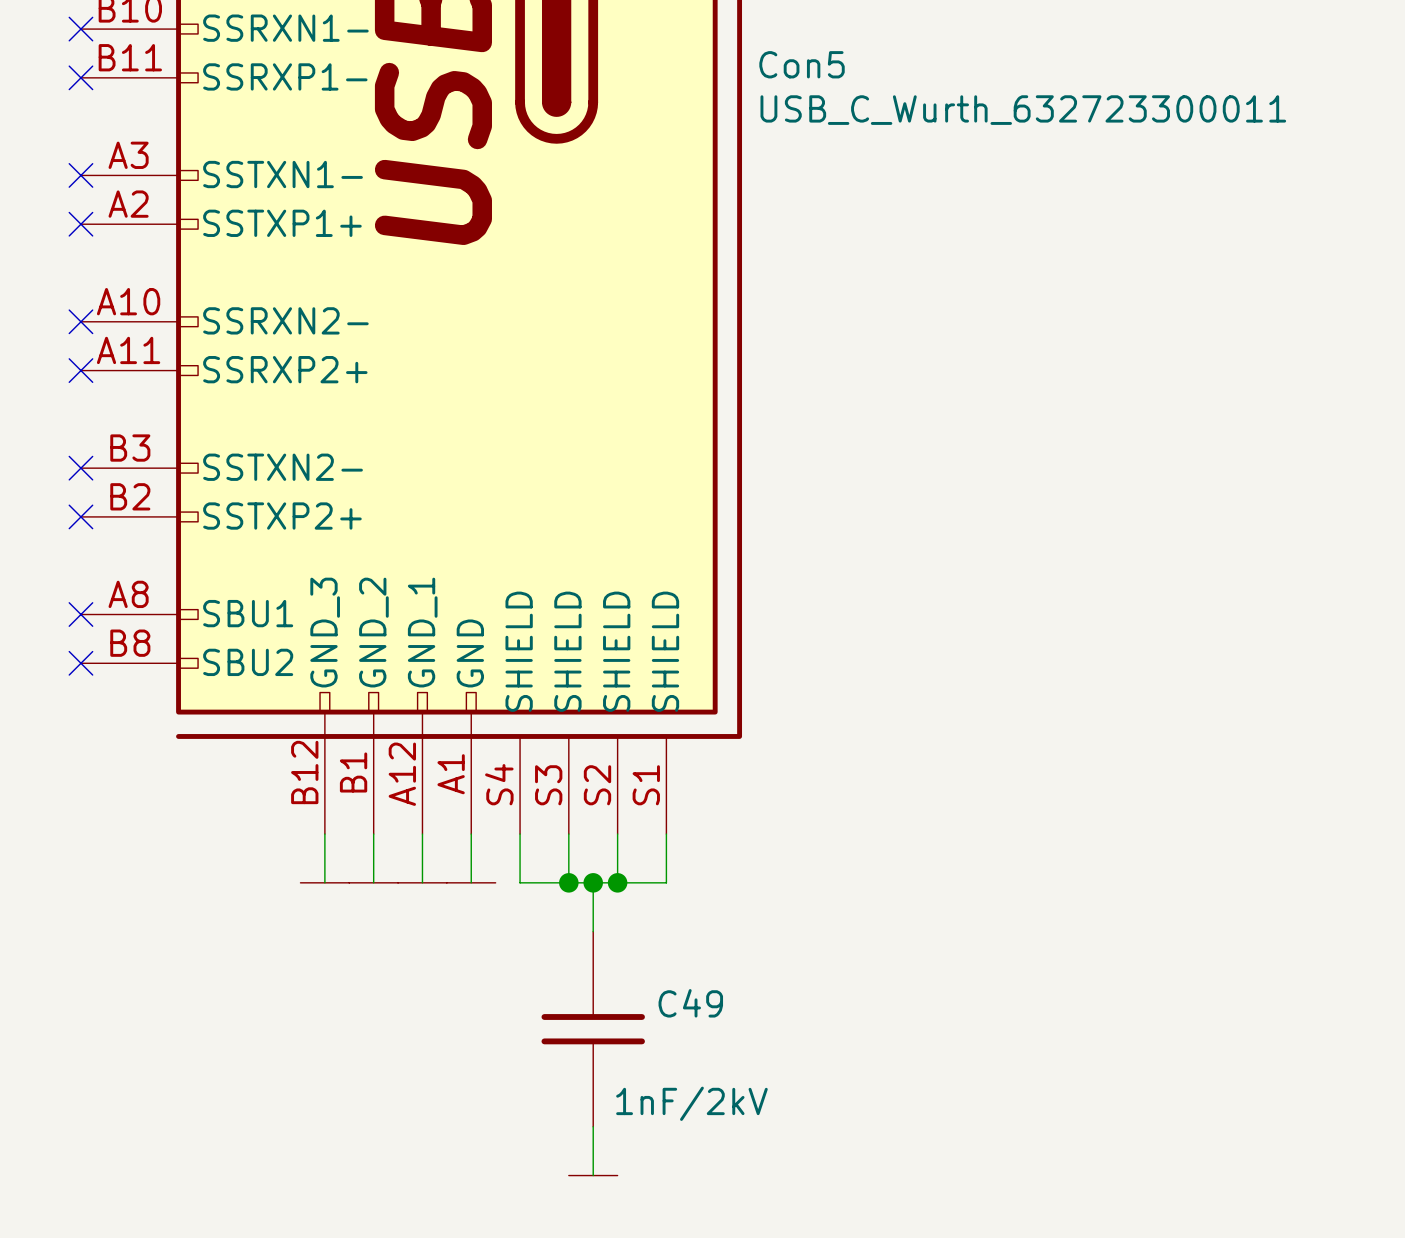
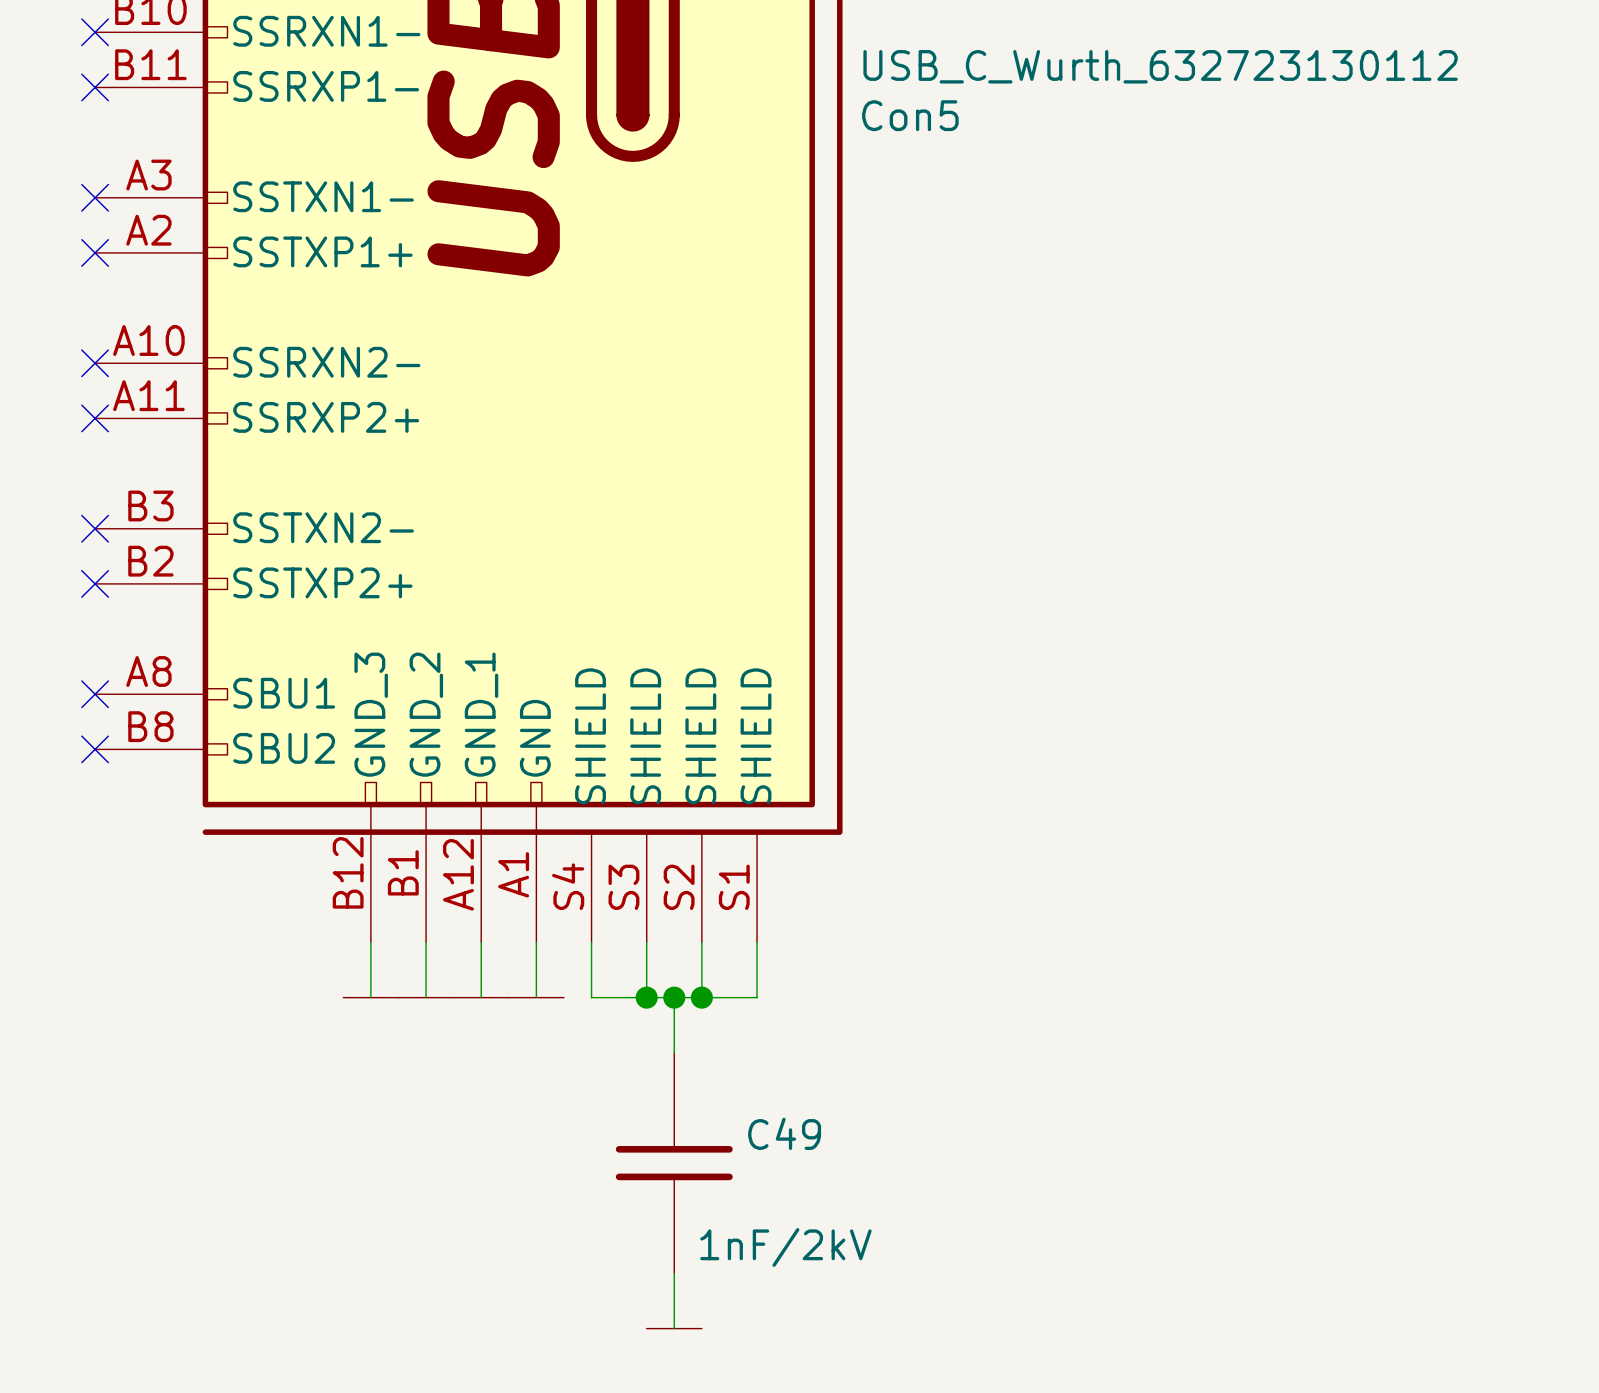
Con5 name position: Con5 (802, 64) -> Con5 (910, 115)
Con5 value: USB_C_Wurth_632723300011 (1023, 110) -> USB_C_Wurth_632723130112 (1160, 66)

